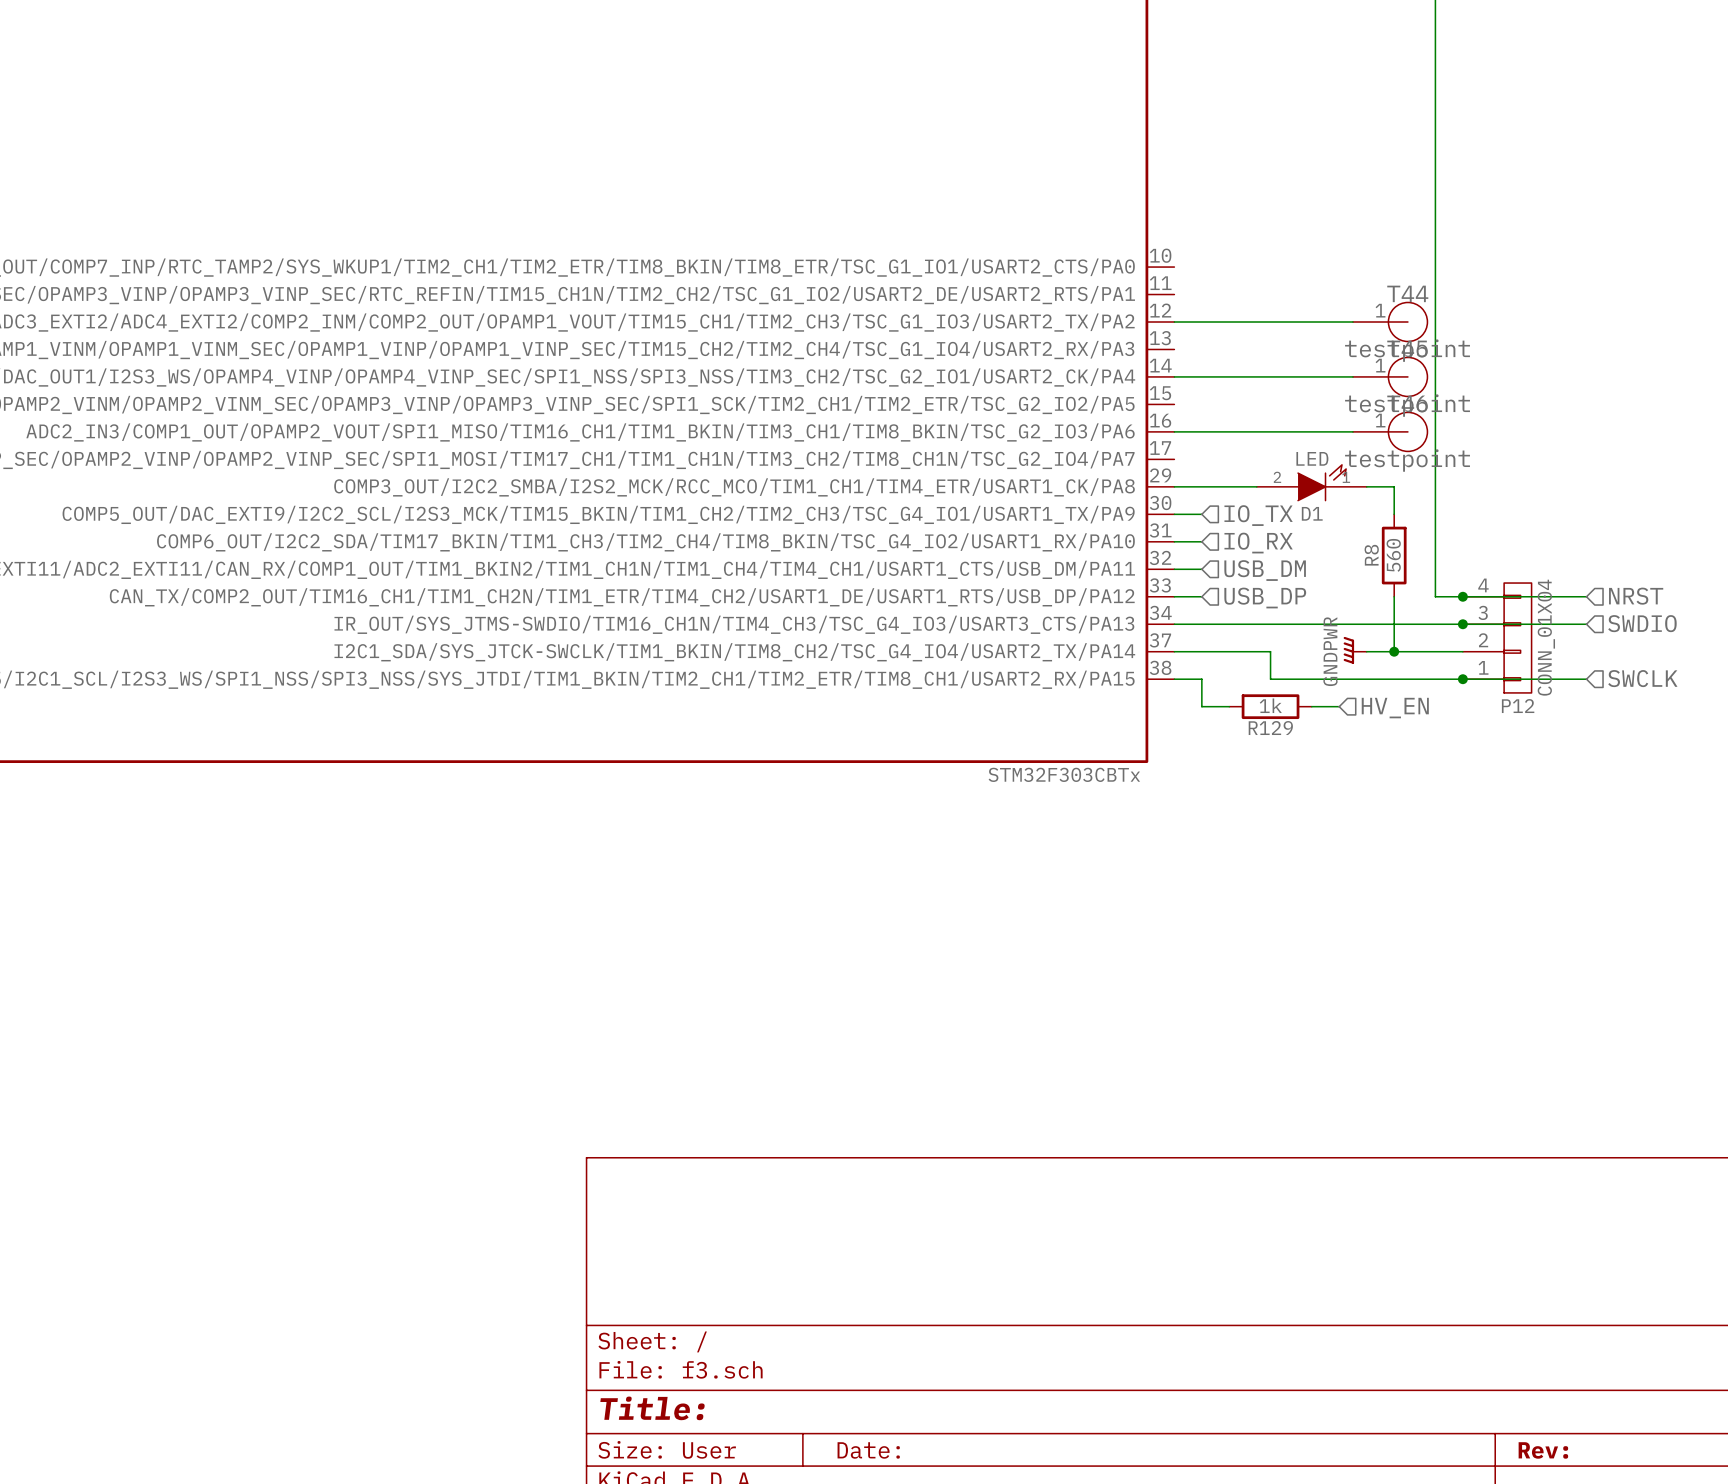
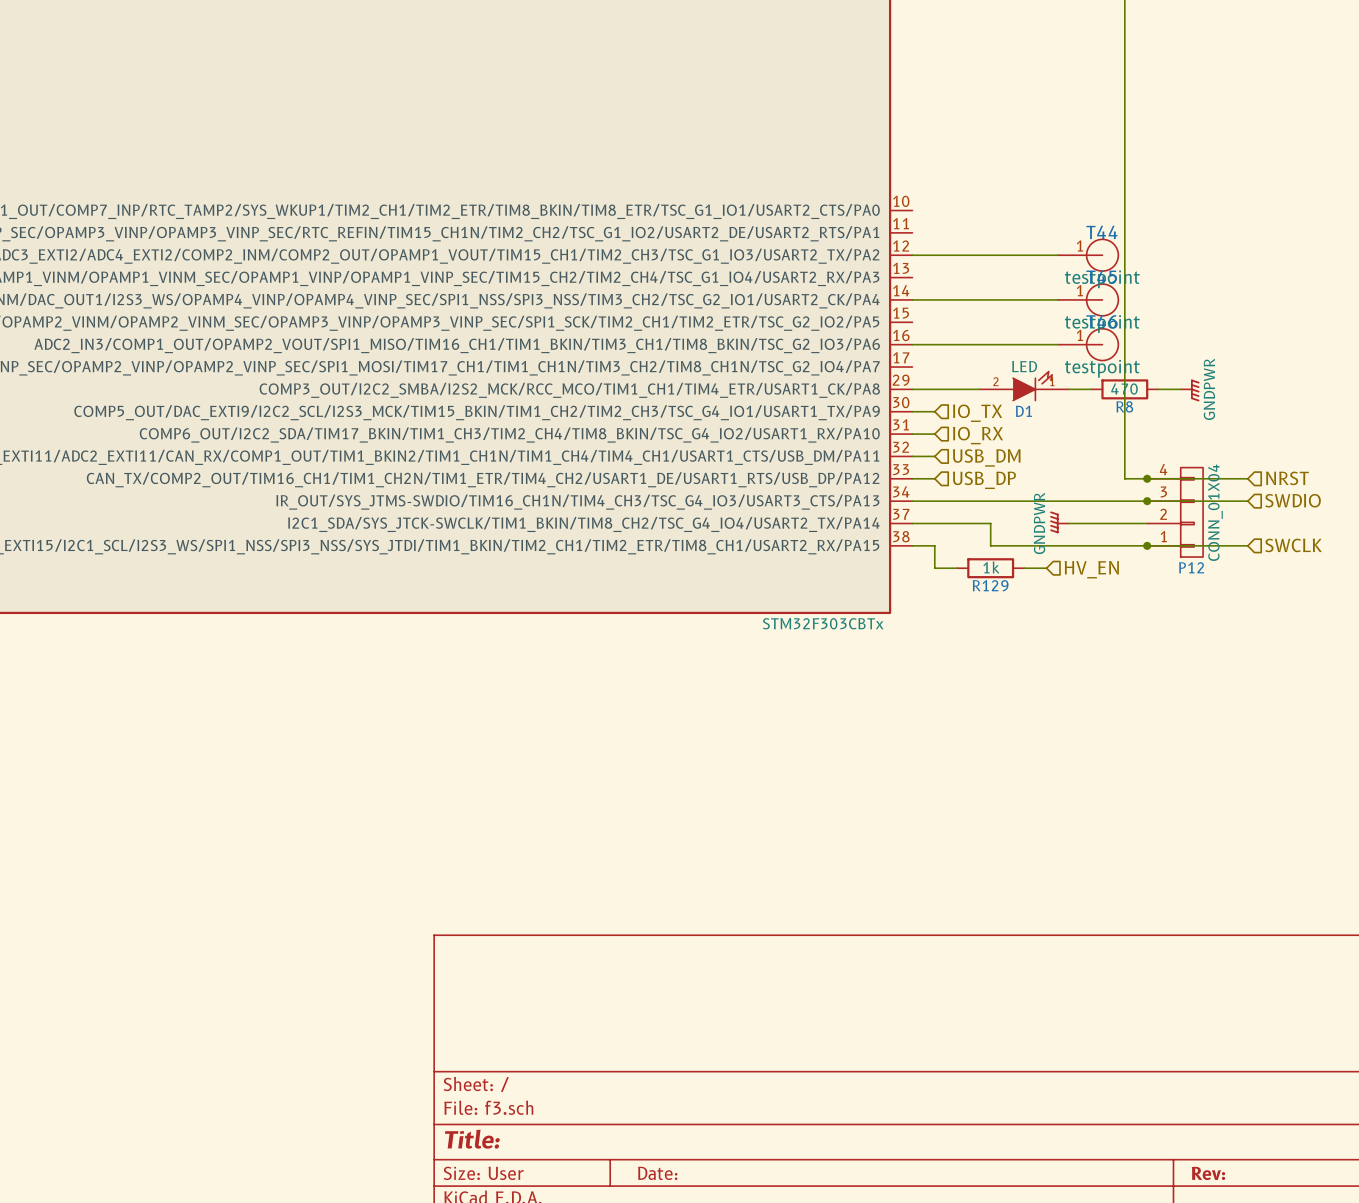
wire: (1394, 486) (1394, 514) -> none
wire: none -> (1158, 389) (1180, 389)
power symbol: none -> GNDPWR (1190, 390)
R8 name position: R8 (1371, 555) -> R8 (1124, 406)
R8 value: 560 (1393, 555) -> 470 (1124, 389)
R8 rotation: 0° (1394, 555) -> 90° clockwise (1124, 389)
R8 position: (1394, 555) -> (1124, 389)
wire: (1394, 596) (1394, 651) -> none
junction: (1394, 651) -> none

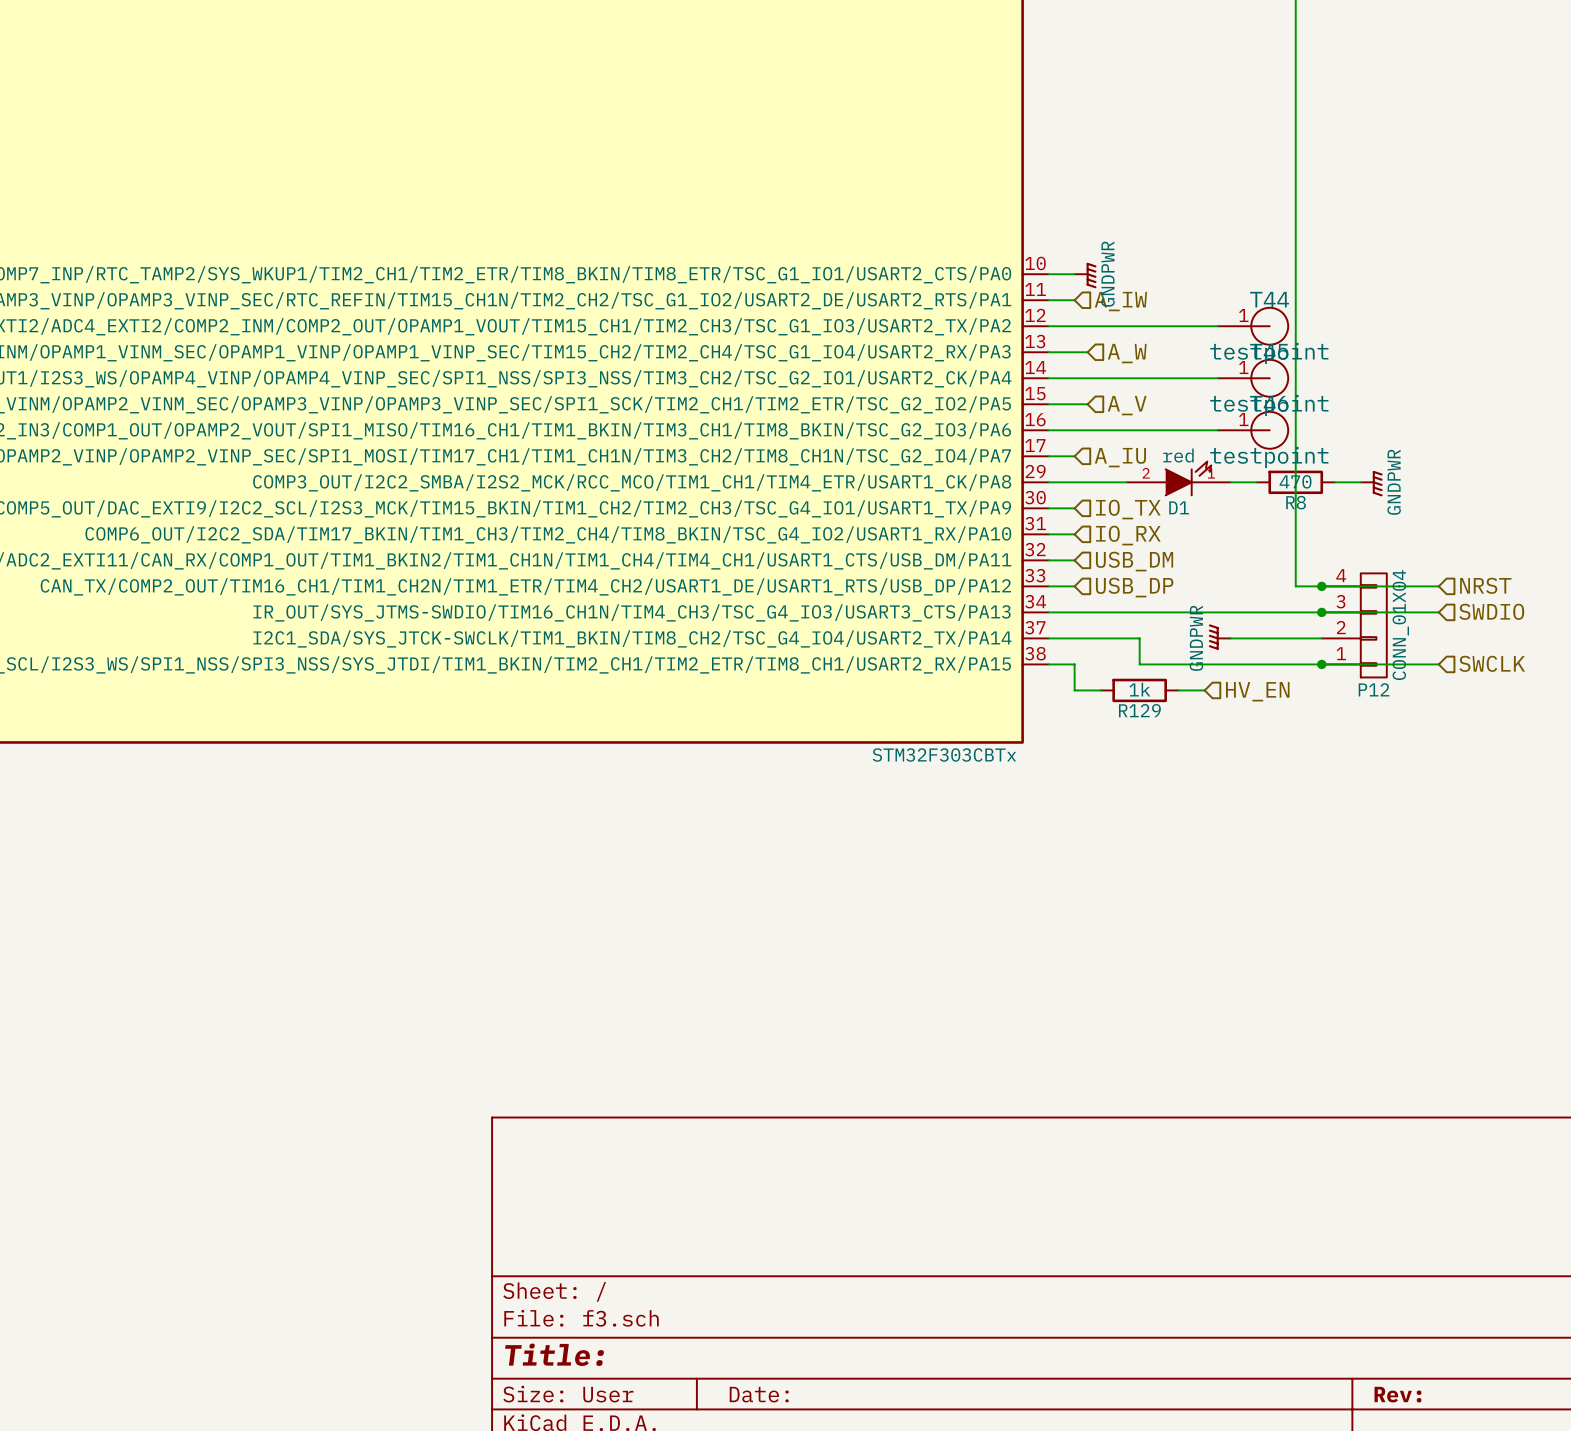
wire: none -> (1048, 274) (1074, 274)
power symbol: none -> GNDPWR (1085, 275)
wire: none -> (1048, 300) (1074, 300)
hierarchical label: none -> A_IW (1120, 301)
wire: none -> (1048, 352) (1087, 352)
hierarchical label: none -> A_W (1127, 353)
wire: none -> (1048, 404) (1087, 404)
hierarchical label: none -> A_V (1127, 405)
D1 value: LED (1024, 366) -> red (1178, 455)
wire: none -> (1048, 456) (1074, 456)
hierarchical label: none -> A_IU (1120, 457)

